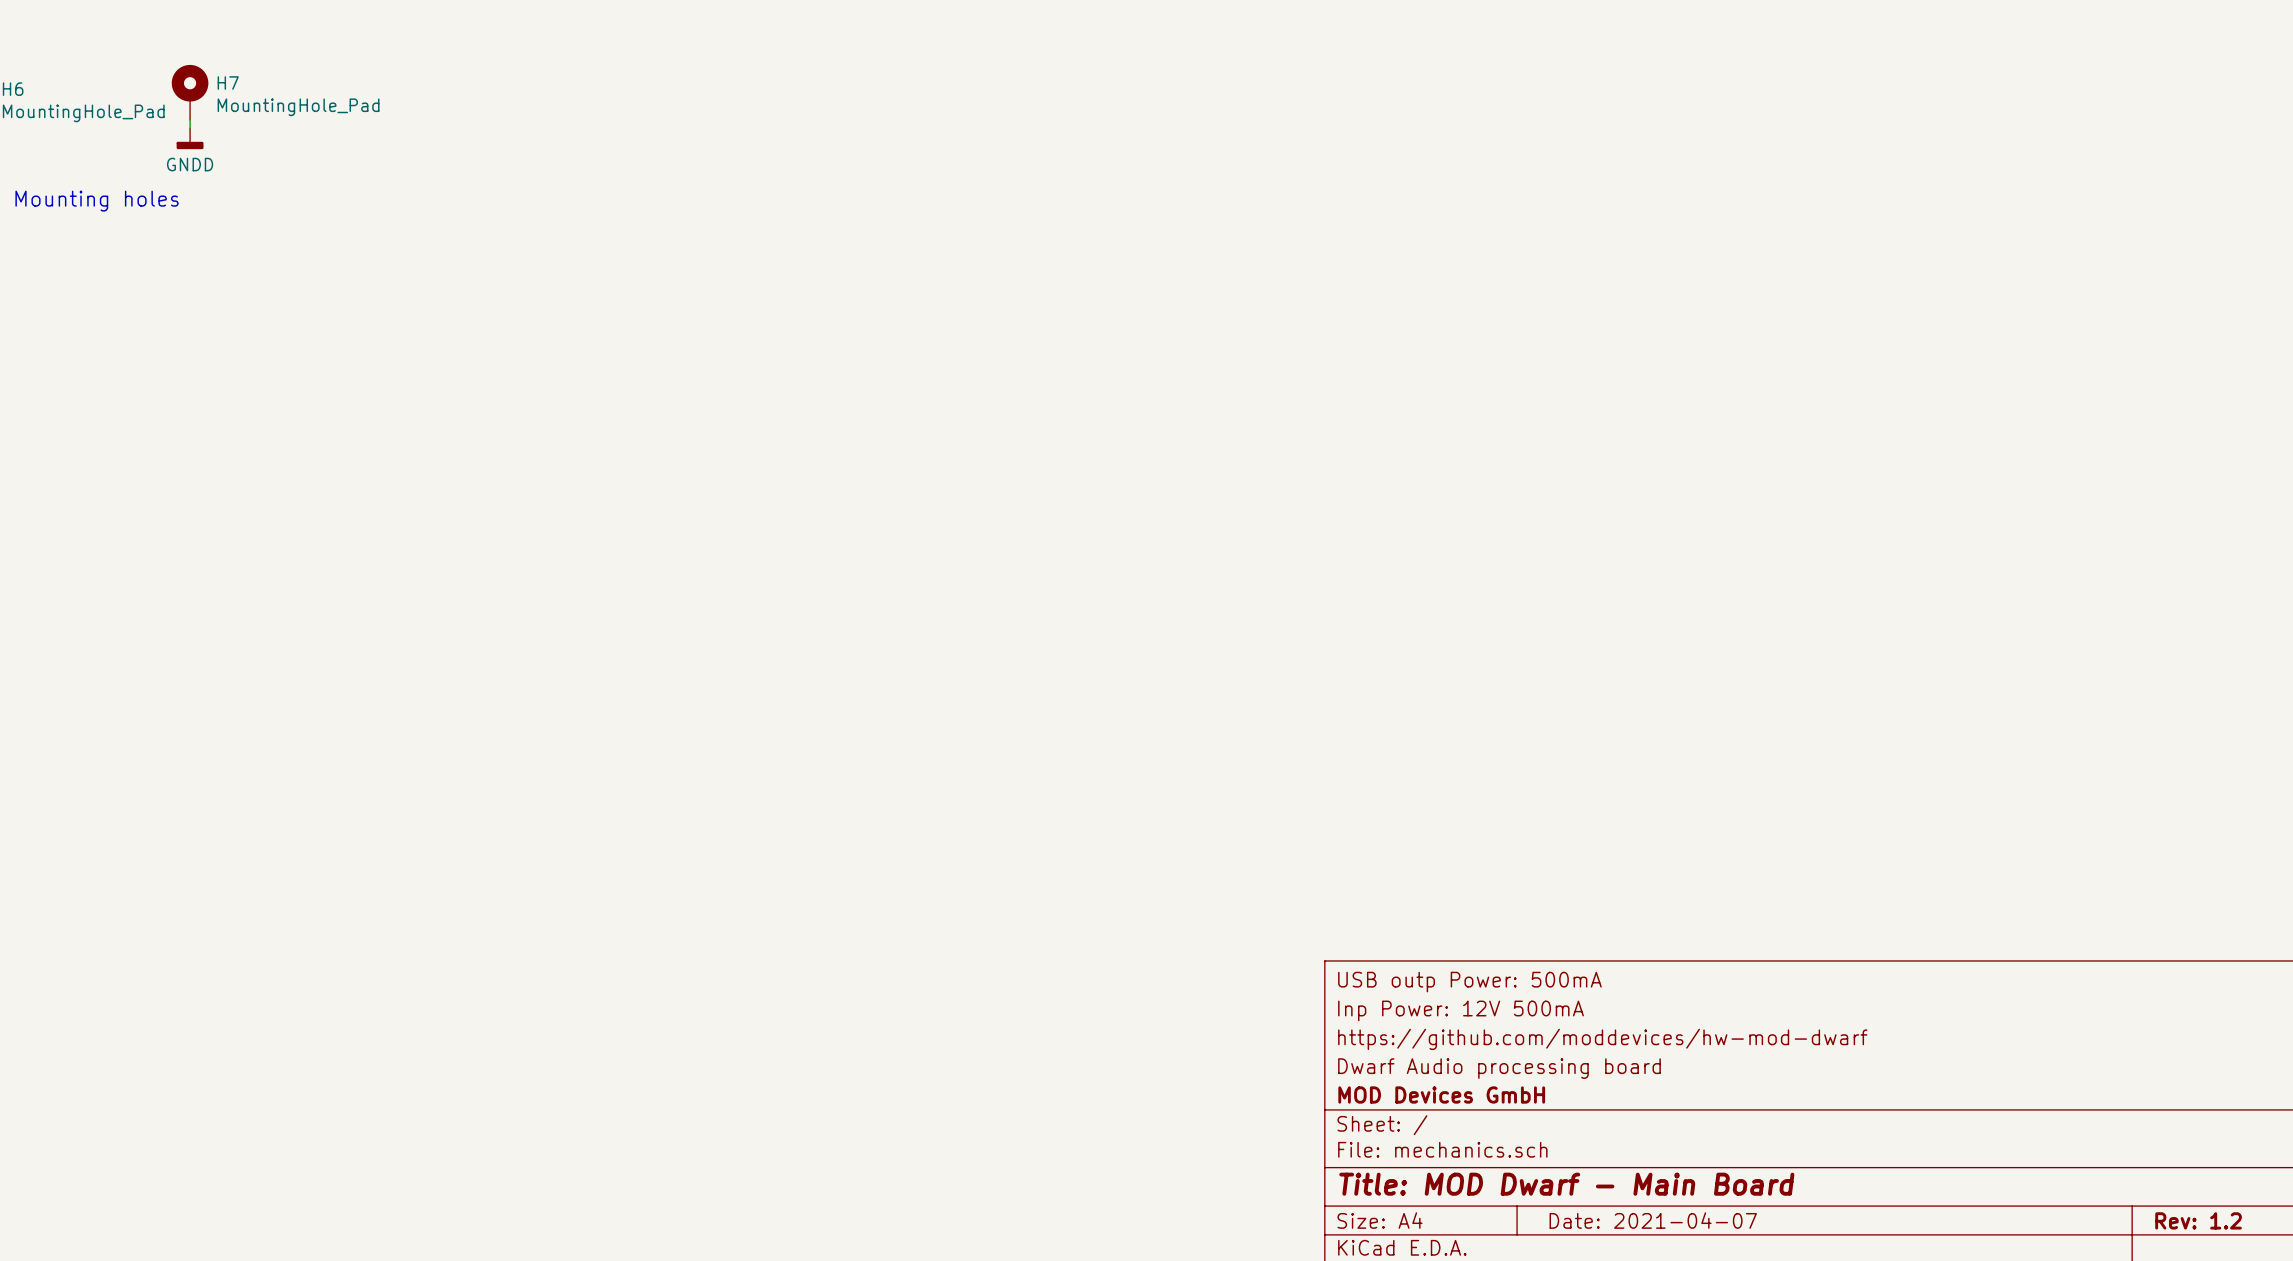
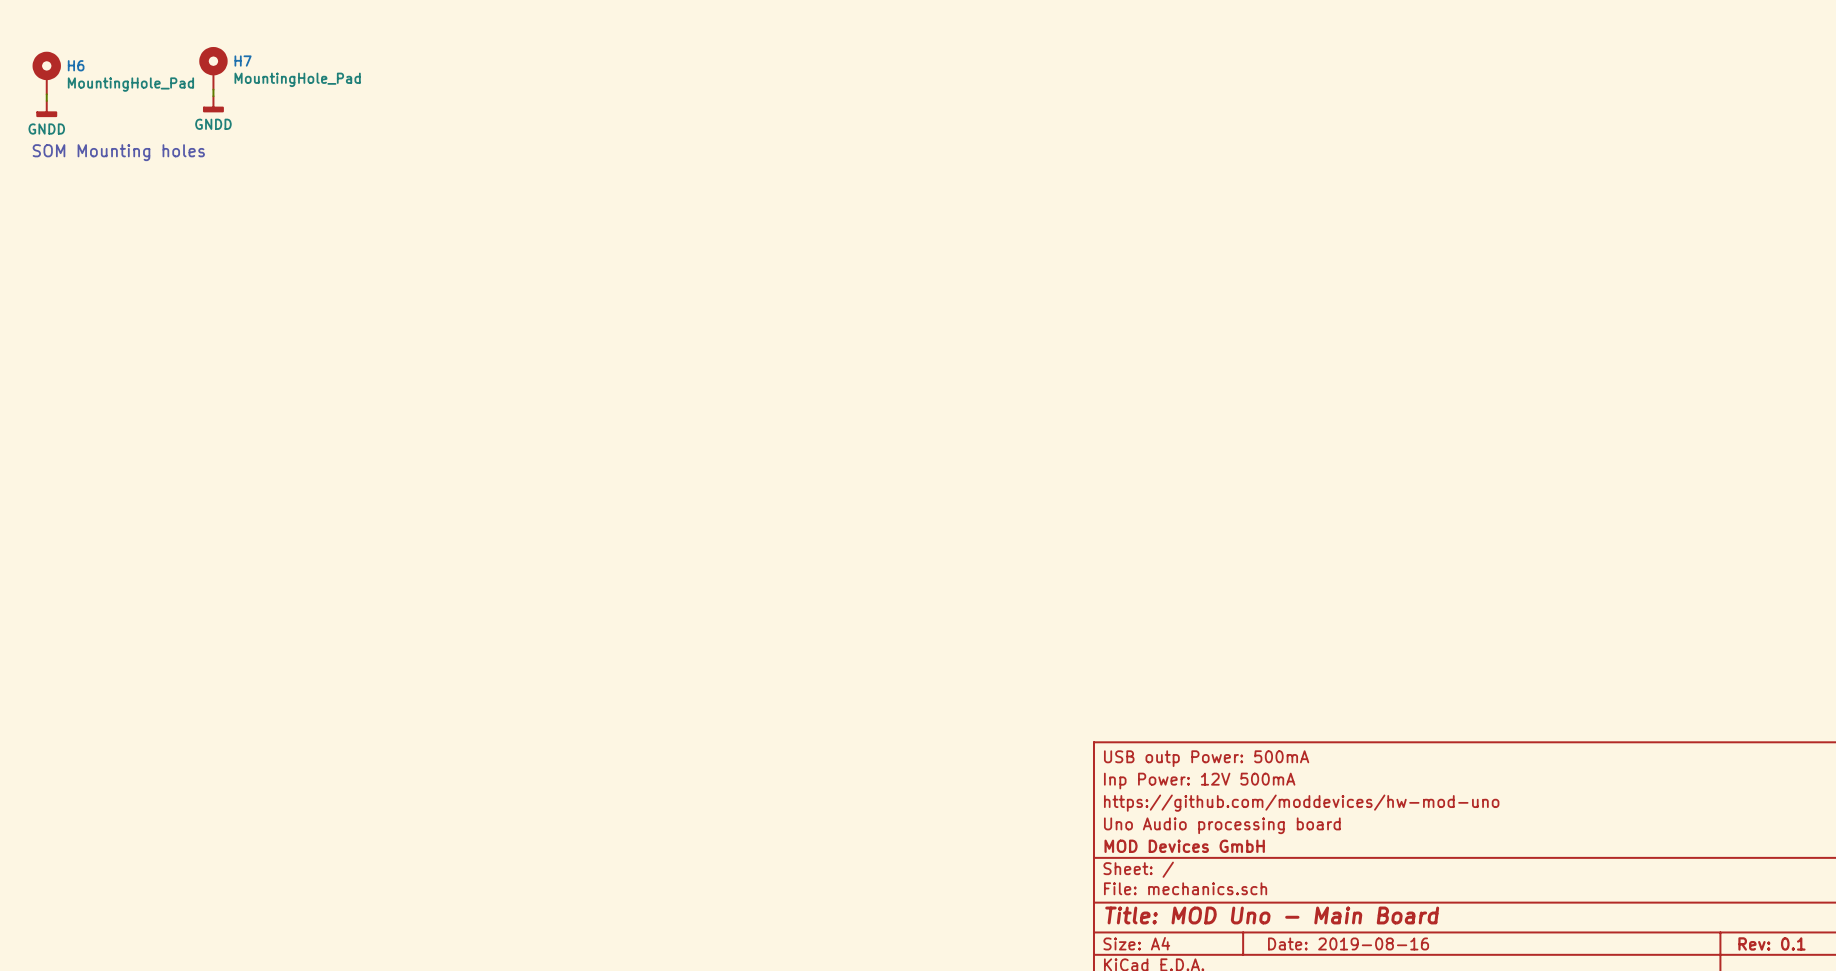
title block: https://github.com/moddevices/hw-mod-dwarf (1602, 1039) -> https://github.com/moddevices/hw-mod-uno (1301, 803)
title block: Dwarf Audio processing board (1499, 1068) -> Uno Audio processing board (1222, 825)
title block: Title: MOD Dwarf - Main Board (1566, 1184) -> Title: MOD Uno - Main Board (1272, 915)
title block: Date: 2021-04-07 (1653, 1220) -> Date: 2019-08-16 (1348, 943)
title block: Rev: 1.2 (2198, 1220) -> Rev: 0.1 (1771, 943)

